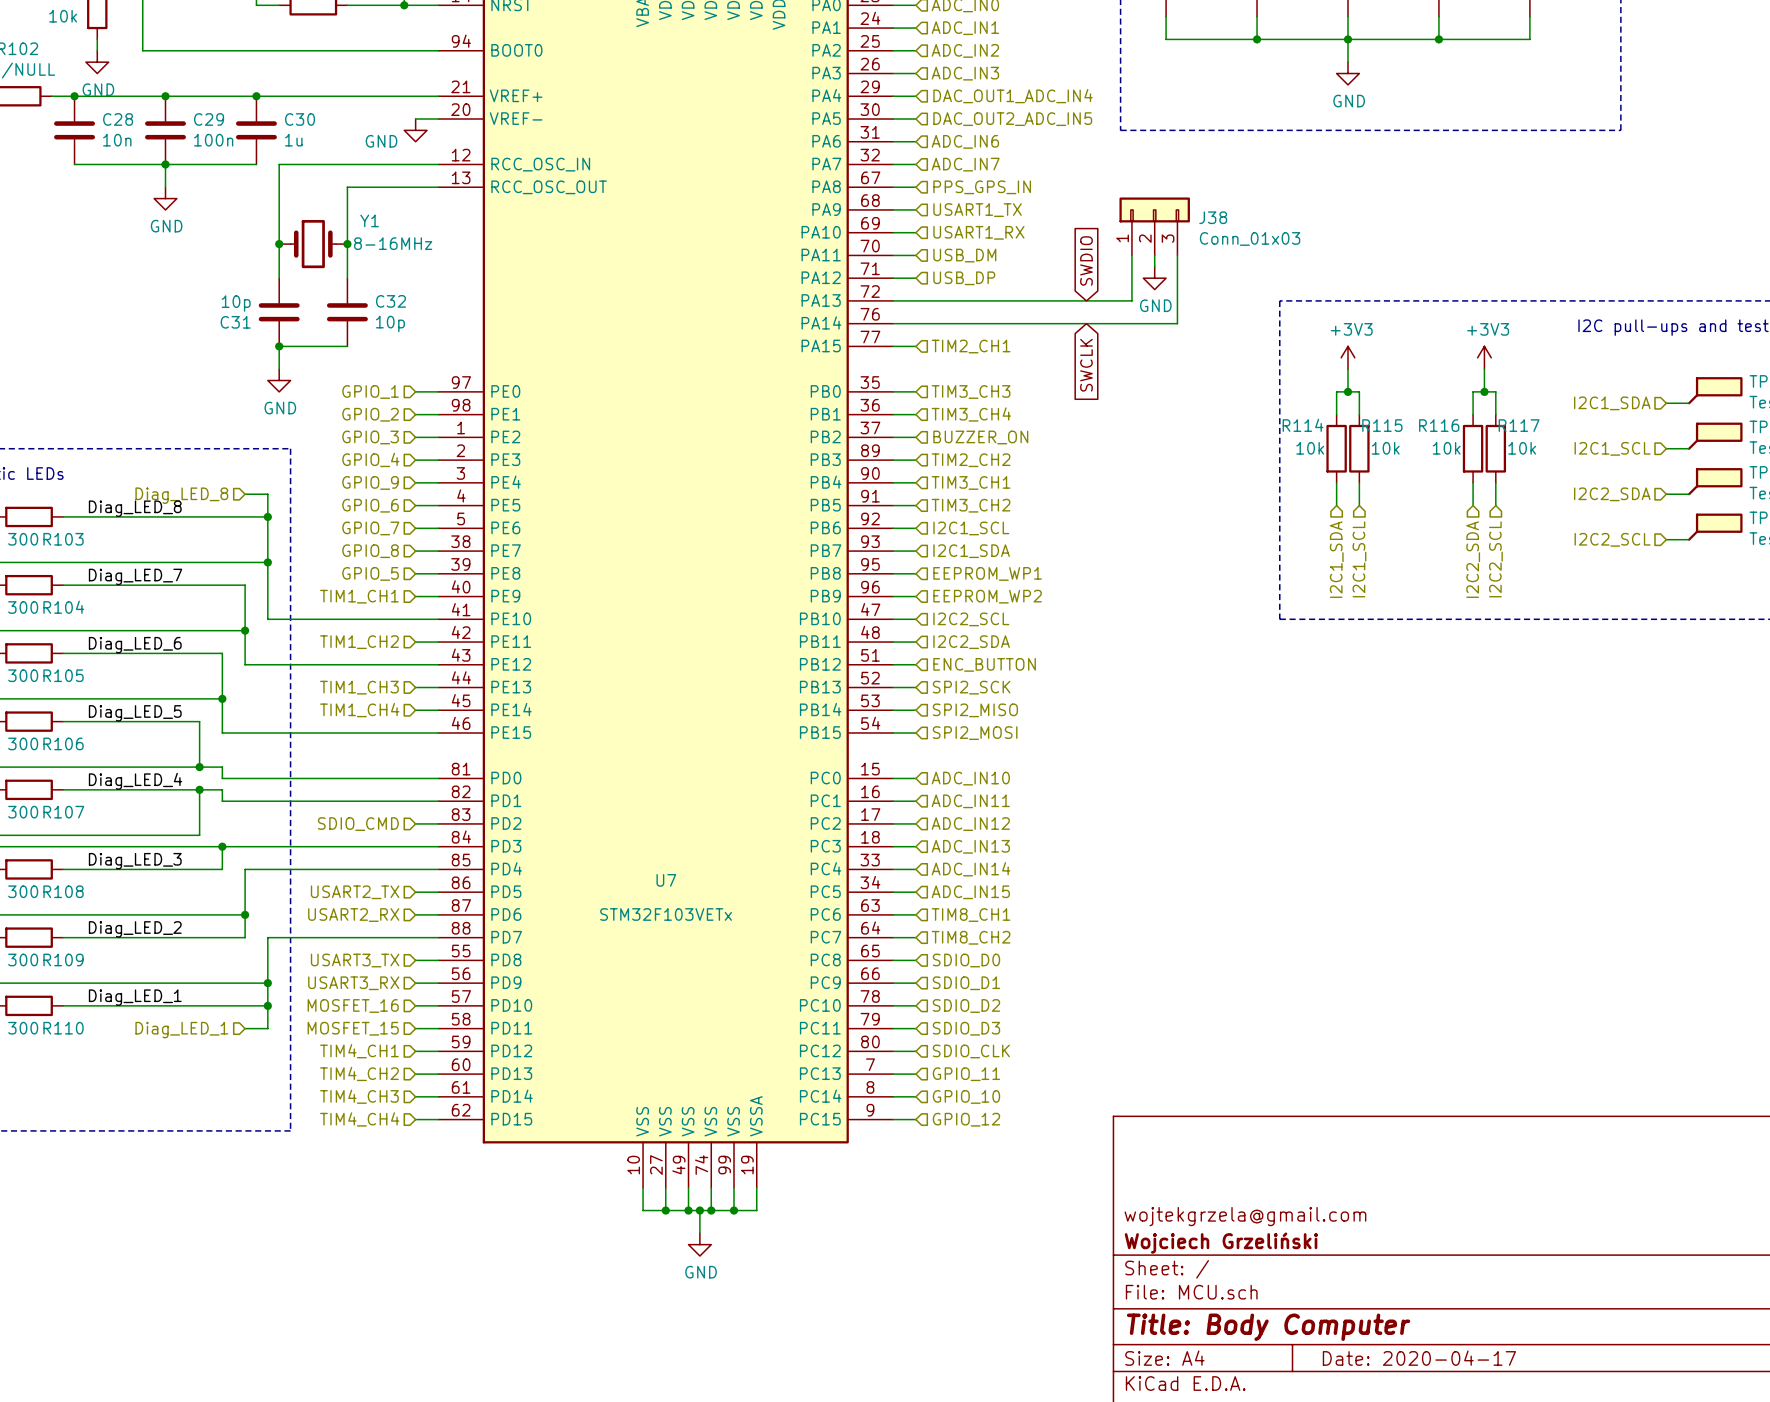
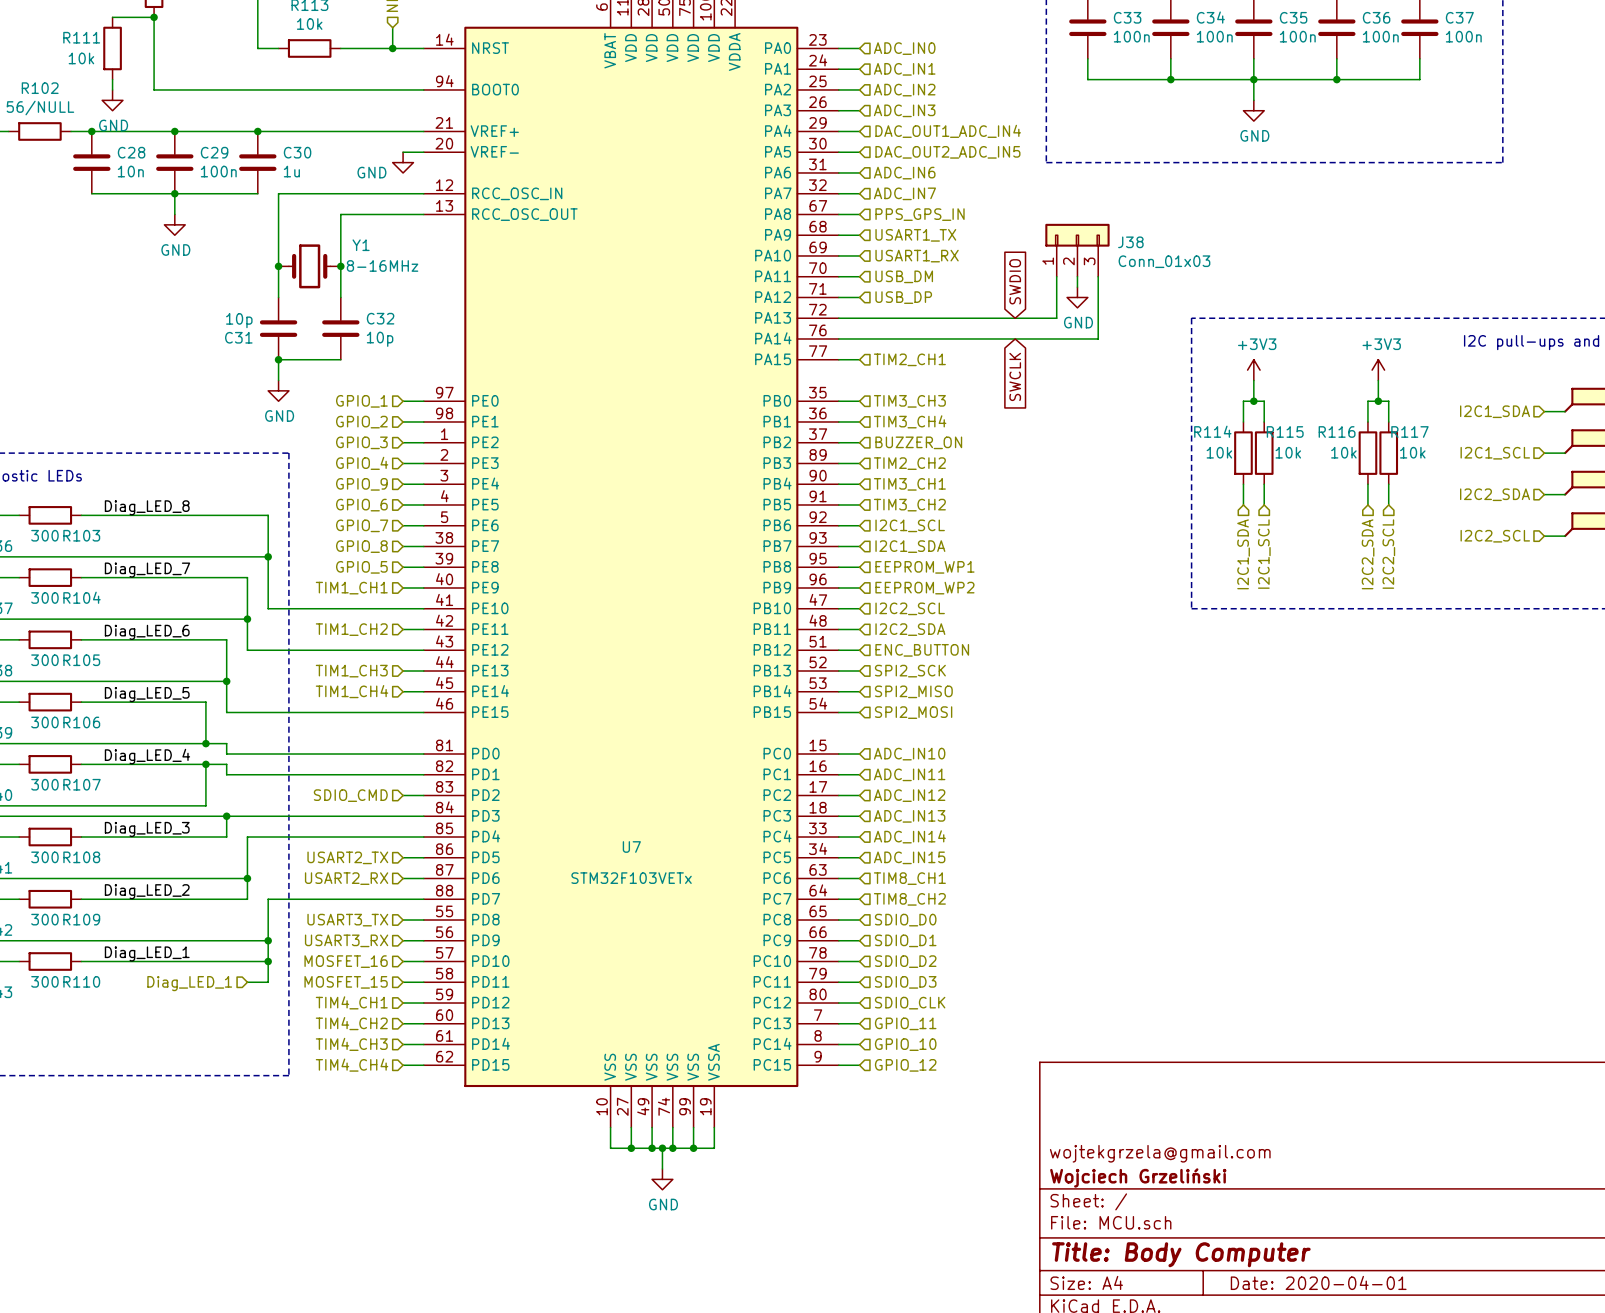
wire: (245, 494) (267, 494) (267, 516) -> none
hierarchical label: Diag_LED_8 (181, 495) -> none
junction: (267, 516) -> none
title block: Date: 2020-04-17 (1419, 1358) -> Date: 2020-04-01 (1318, 1282)

